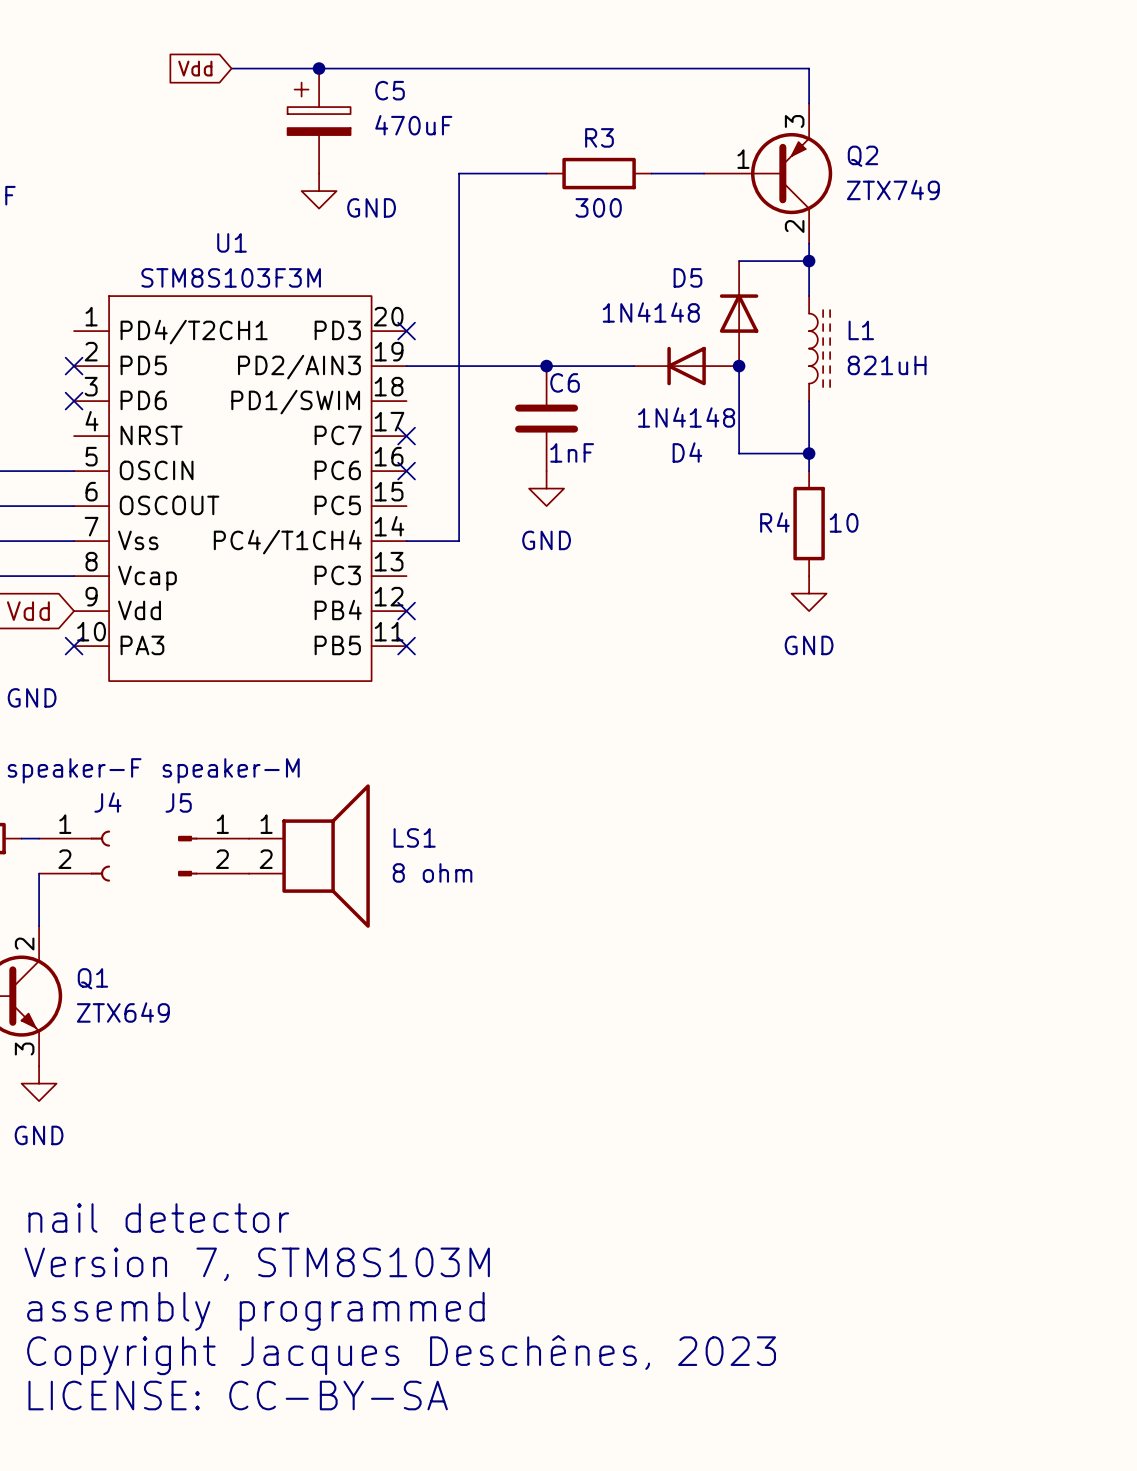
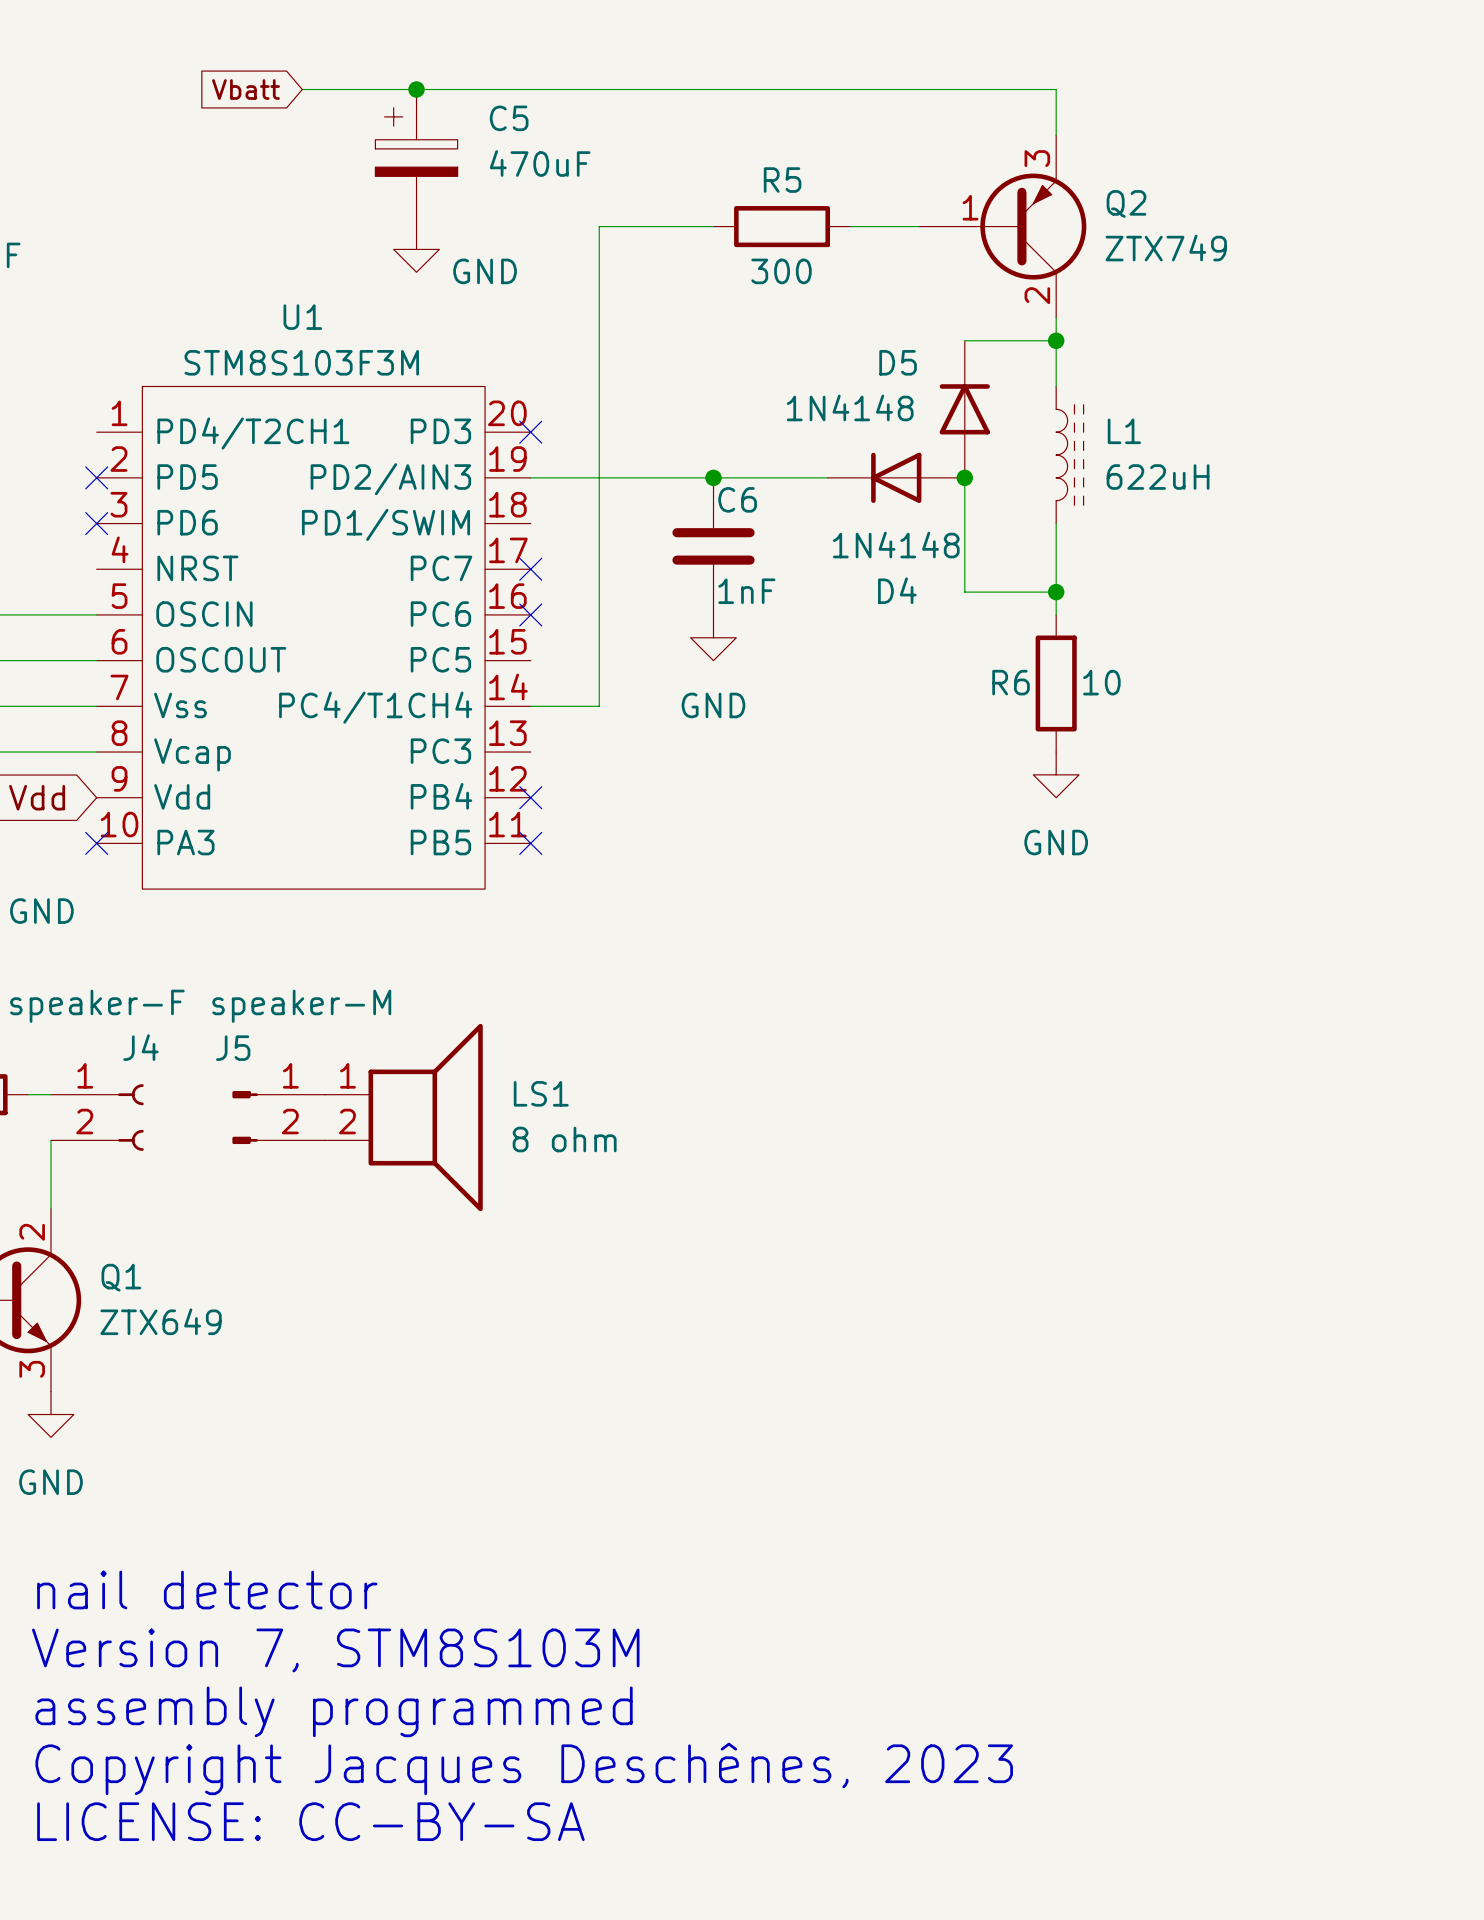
global label: Vdd (195, 68) -> Vbatt (245, 89)
R3 name: R3 (599, 137) -> R5 (782, 180)
L1 value: 821uH (887, 365) -> 622uH (1158, 477)
R4 name: R4 (774, 522) -> R6 (1011, 682)

